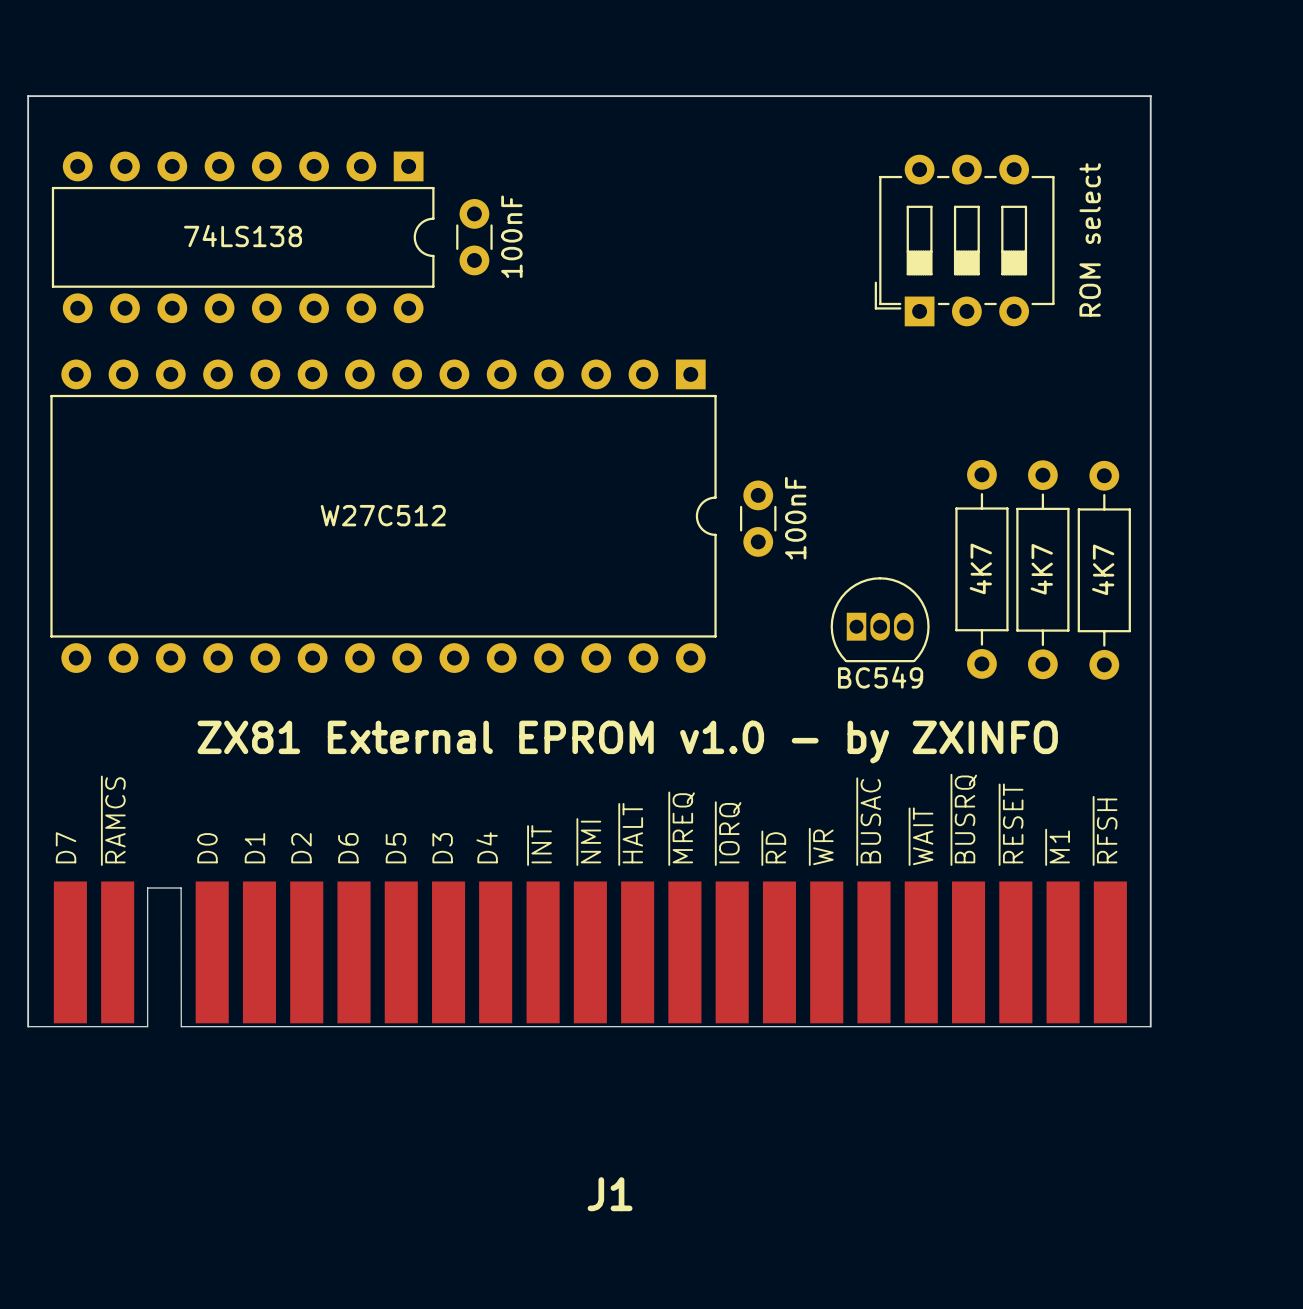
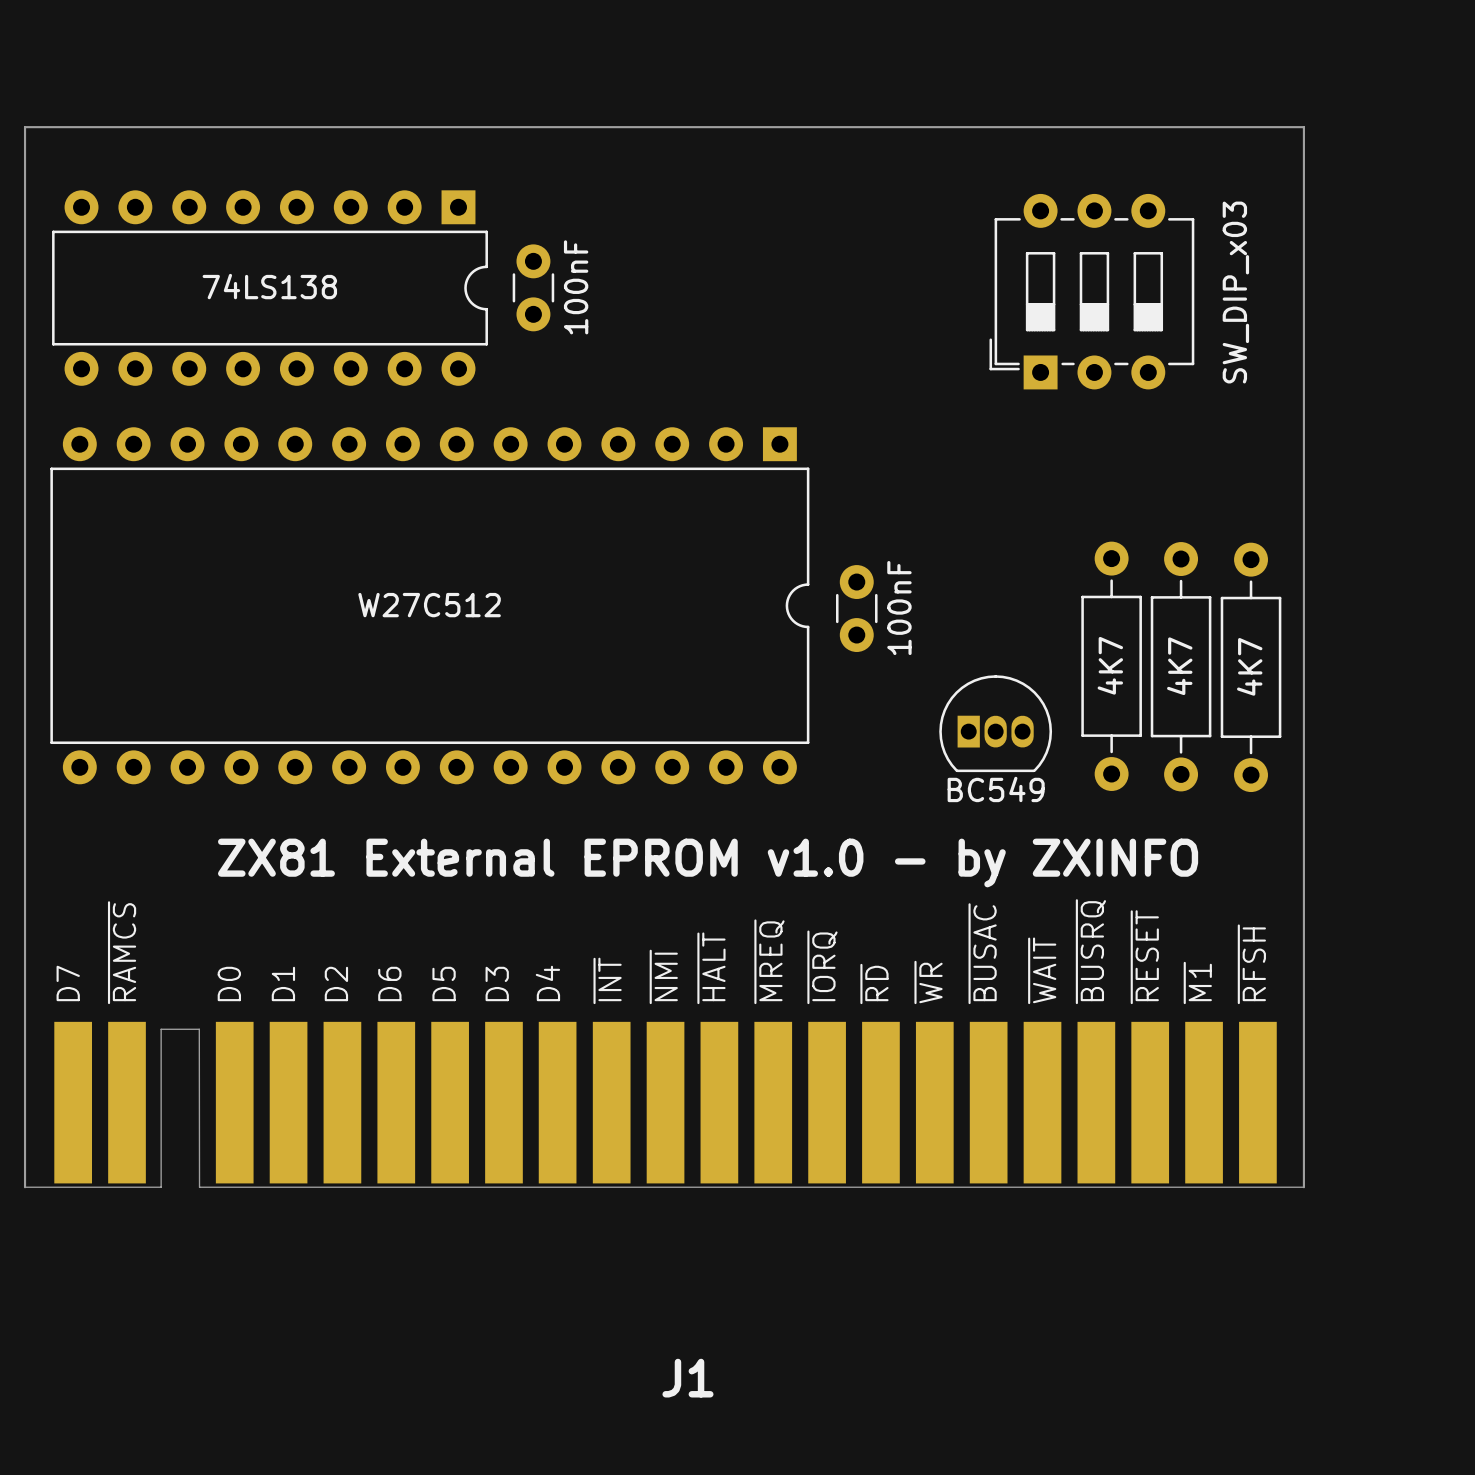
part value: ROM select (1090, 239) -> SW_DIP_x03 (1235, 292)

